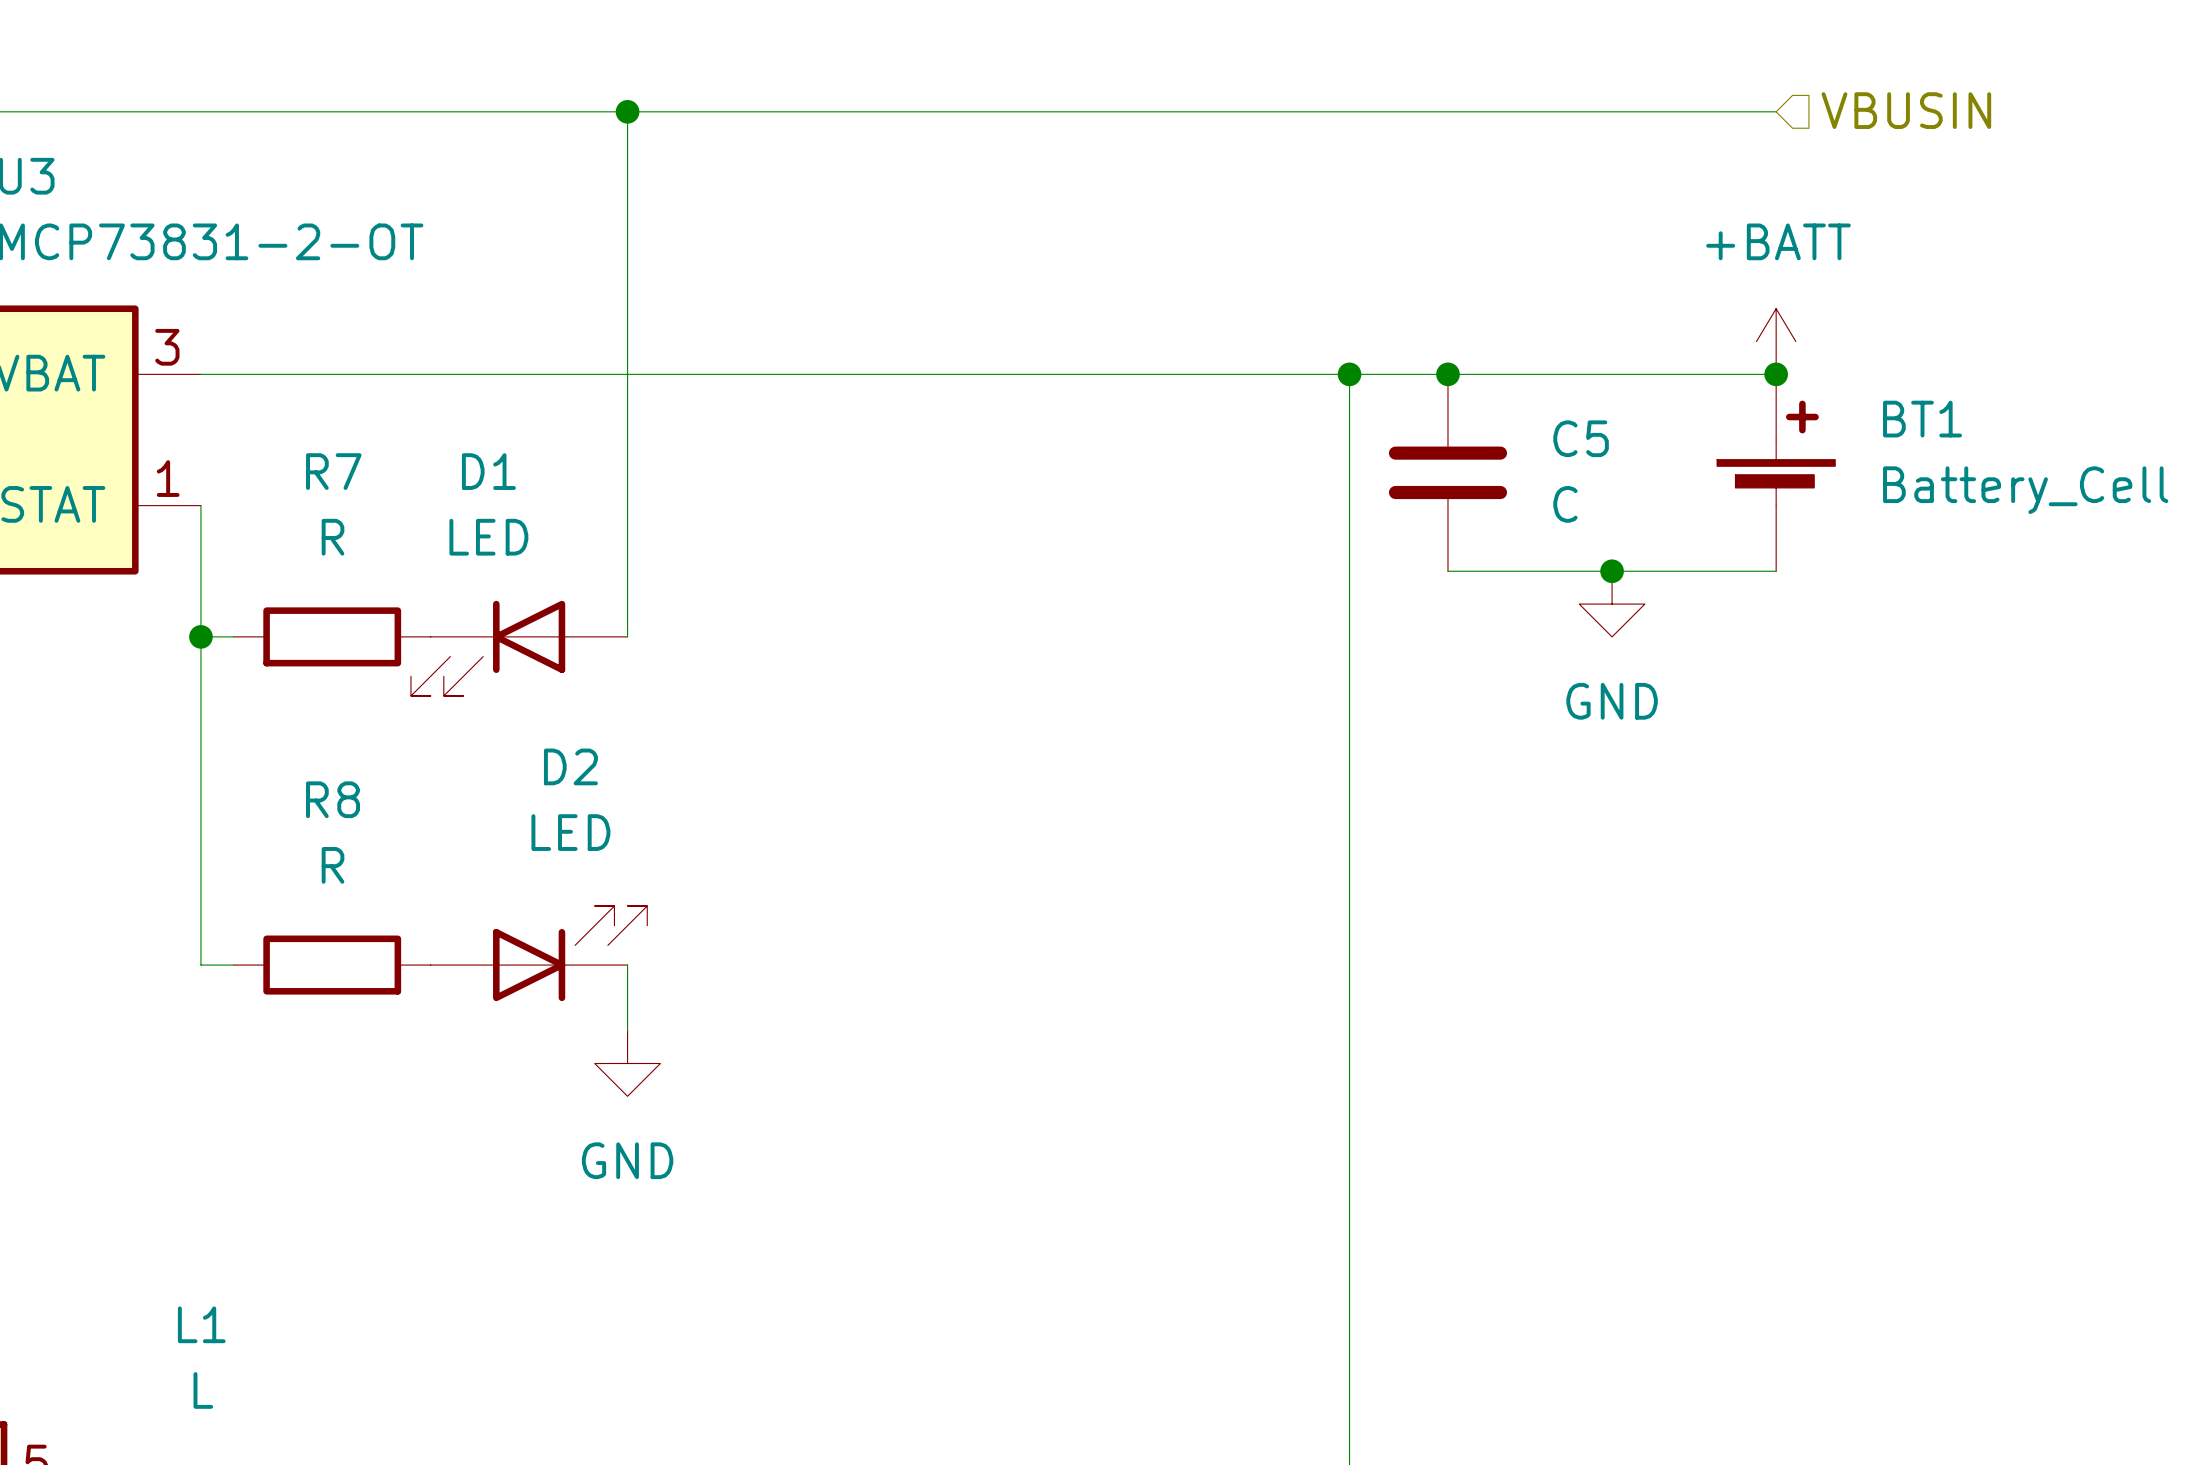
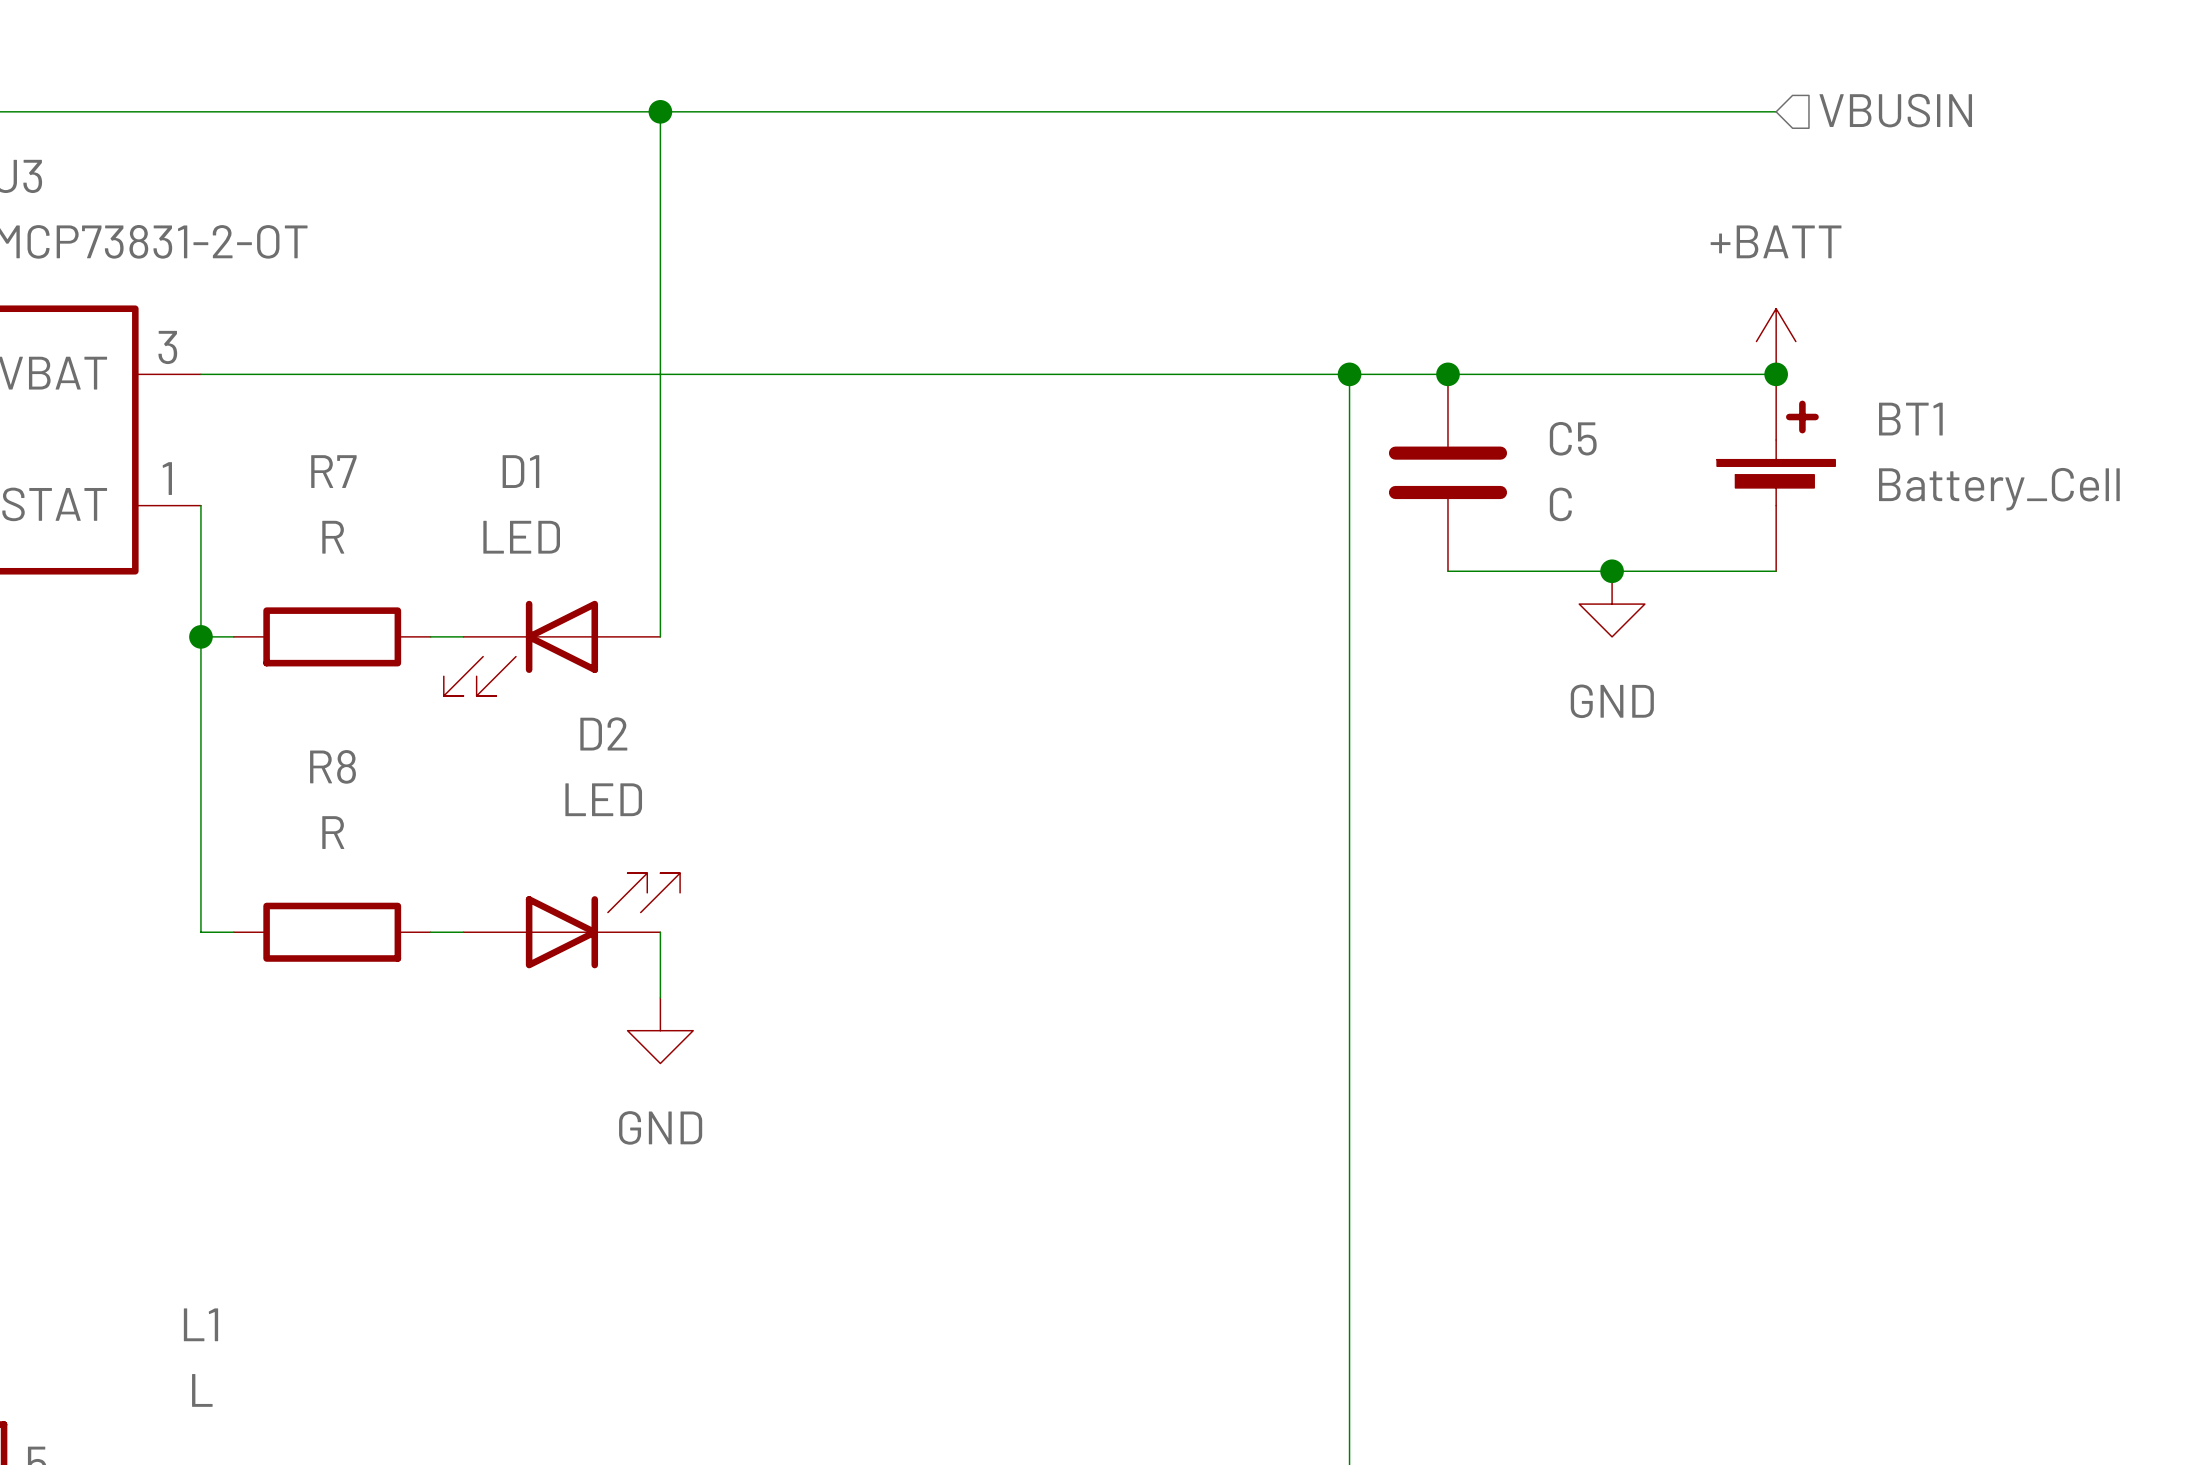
wire: (627, 111) (627, 636) -> (660, 111) (660, 636)
junction position: (627, 111) -> (660, 111)
D1 position: (519, 648) -> (552, 648)
wire: (200, 932) (200, 965) (233, 965) -> (200, 932) (233, 932)
wire: none -> (430, 932) (463, 932)
D2 position: (538, 953) -> (571, 920)
R8 position: (332, 965) -> (332, 932)
wire: (627, 965) (627, 1030) -> (660, 932) (660, 997)
power symbol position: GND (627, 1063) -> GND (660, 1030)

